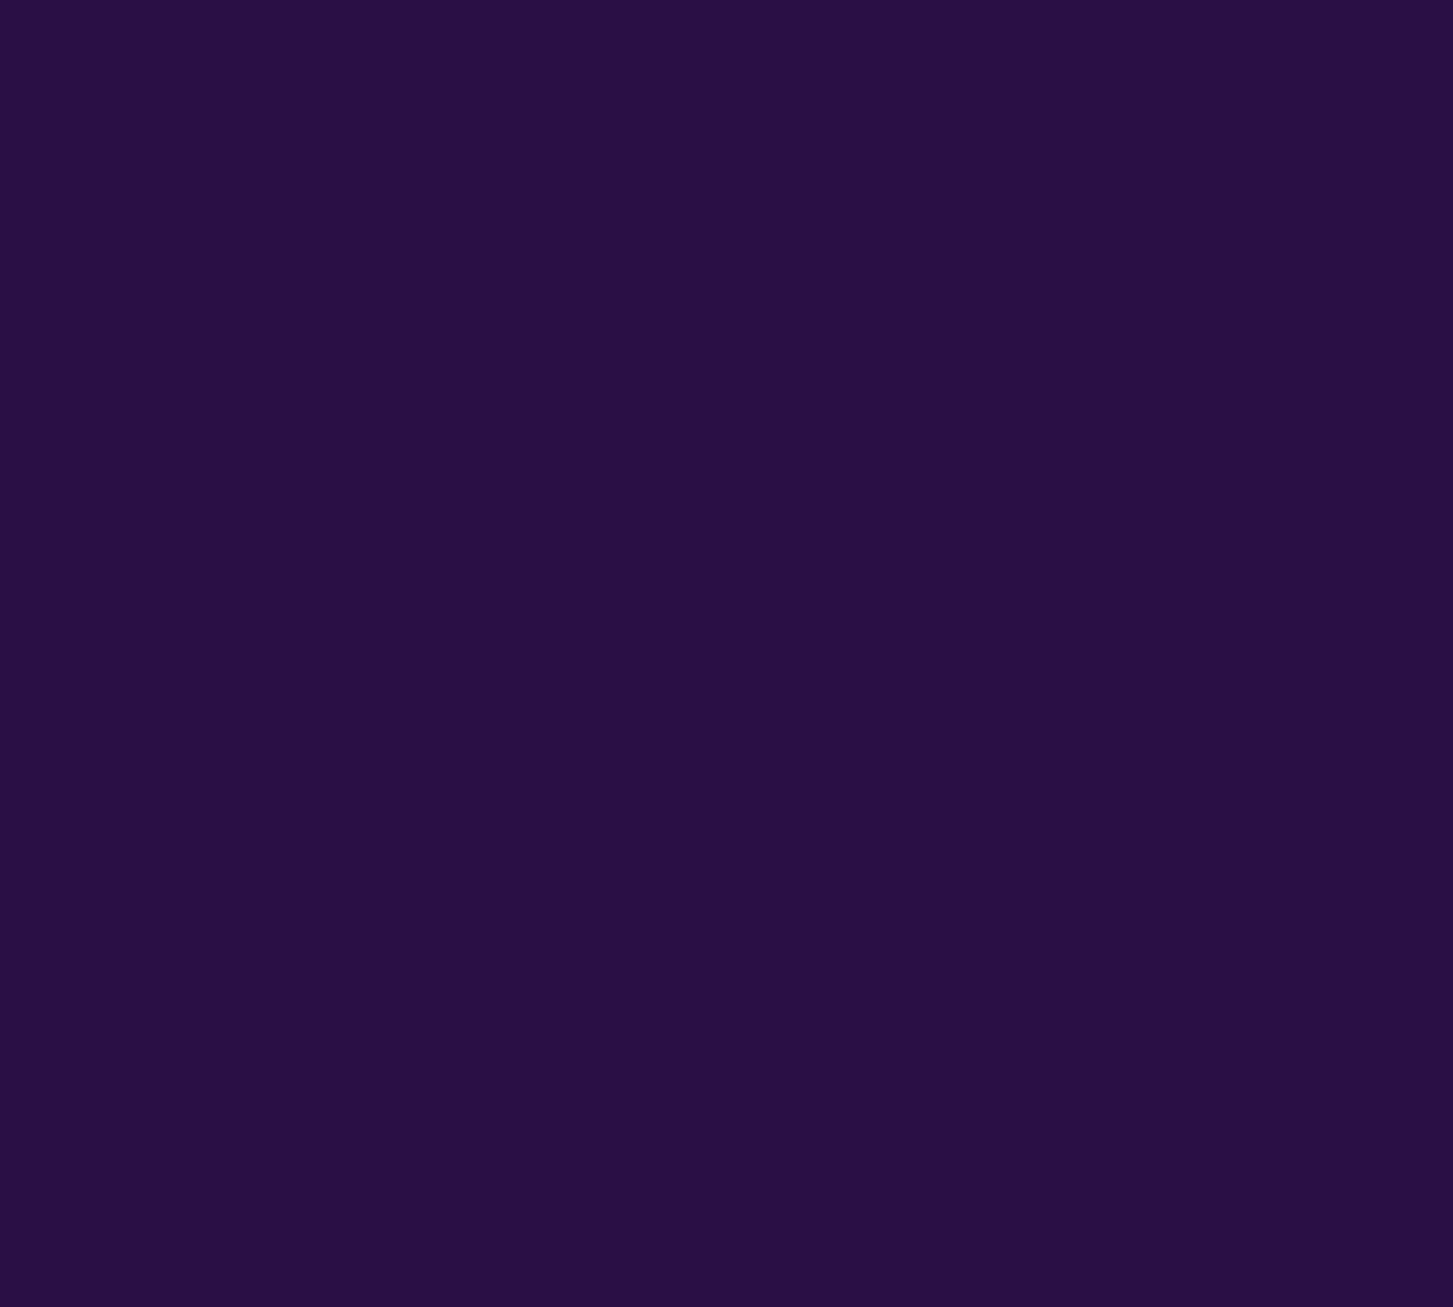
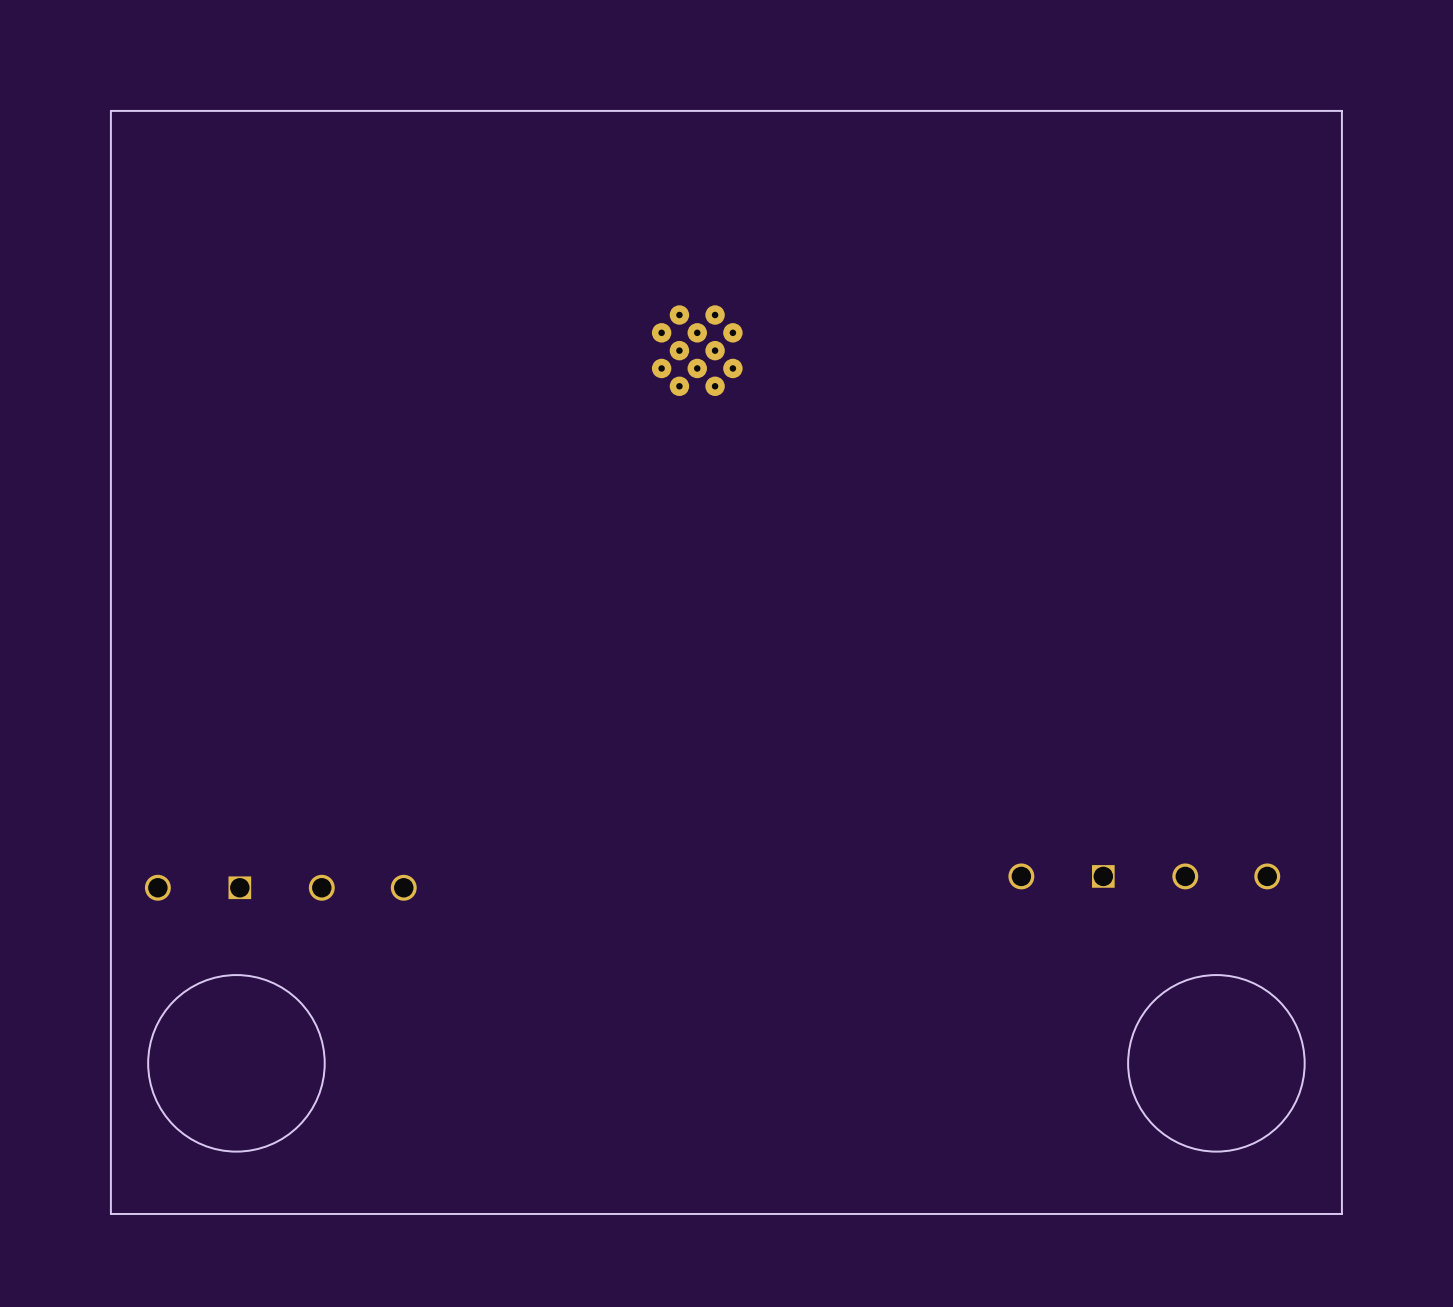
board edge: none -> (1341, 110) (110, 110) (110, 1213) (1341, 1213) (1341, 110)
part: none -> (697, 350)
part: none -> (1144, 876)
part: none -> (280, 887)
round board edge: none -> [147, 974, 326, 1153]
round board edge: none -> [1127, 974, 1306, 1153]

